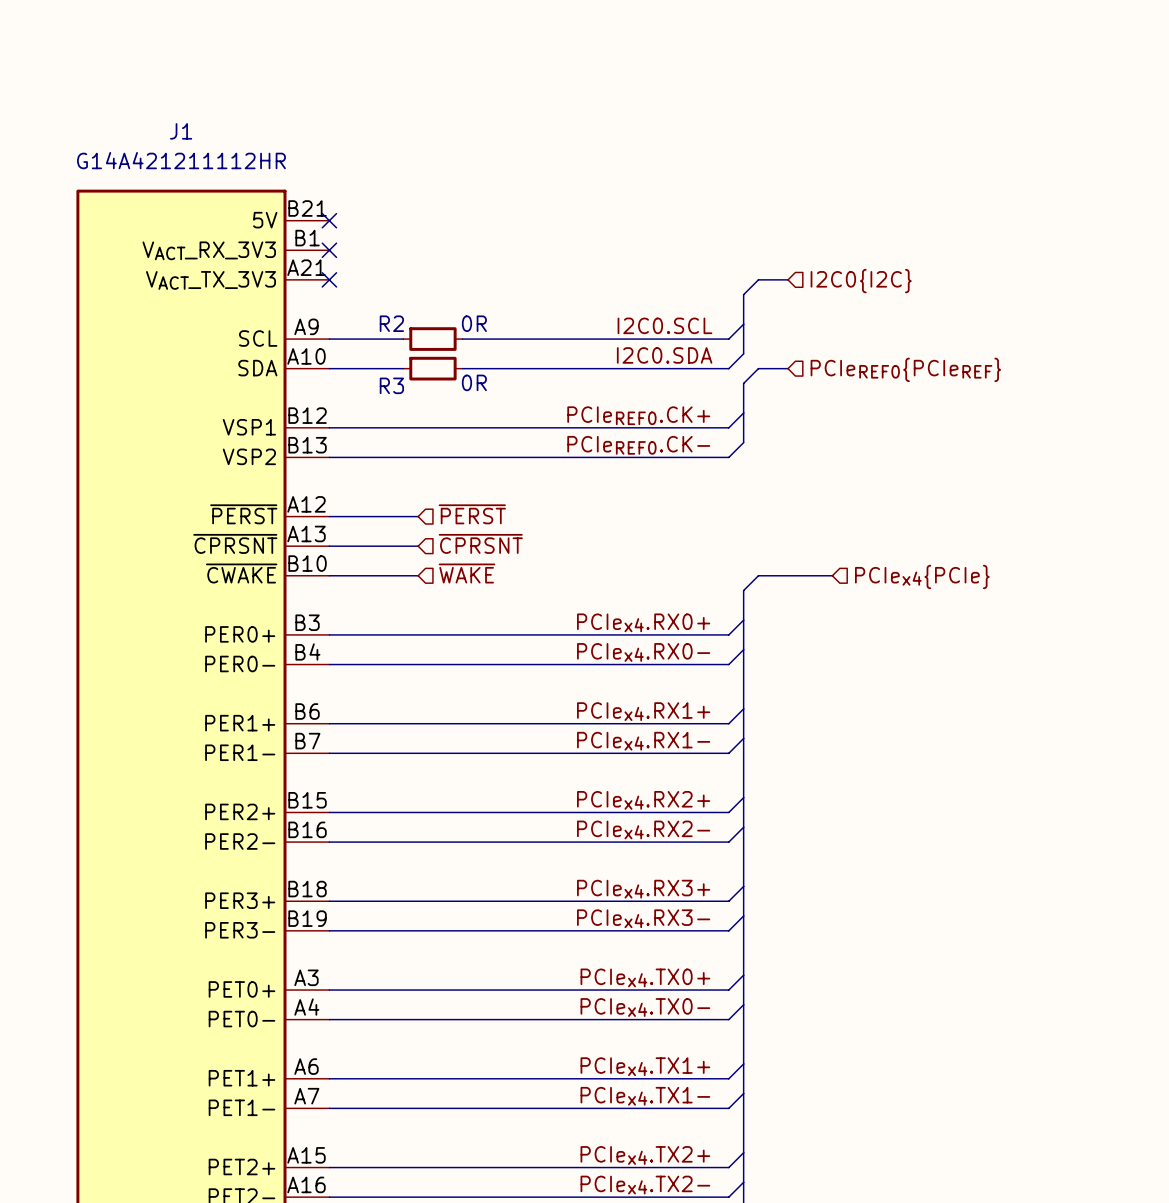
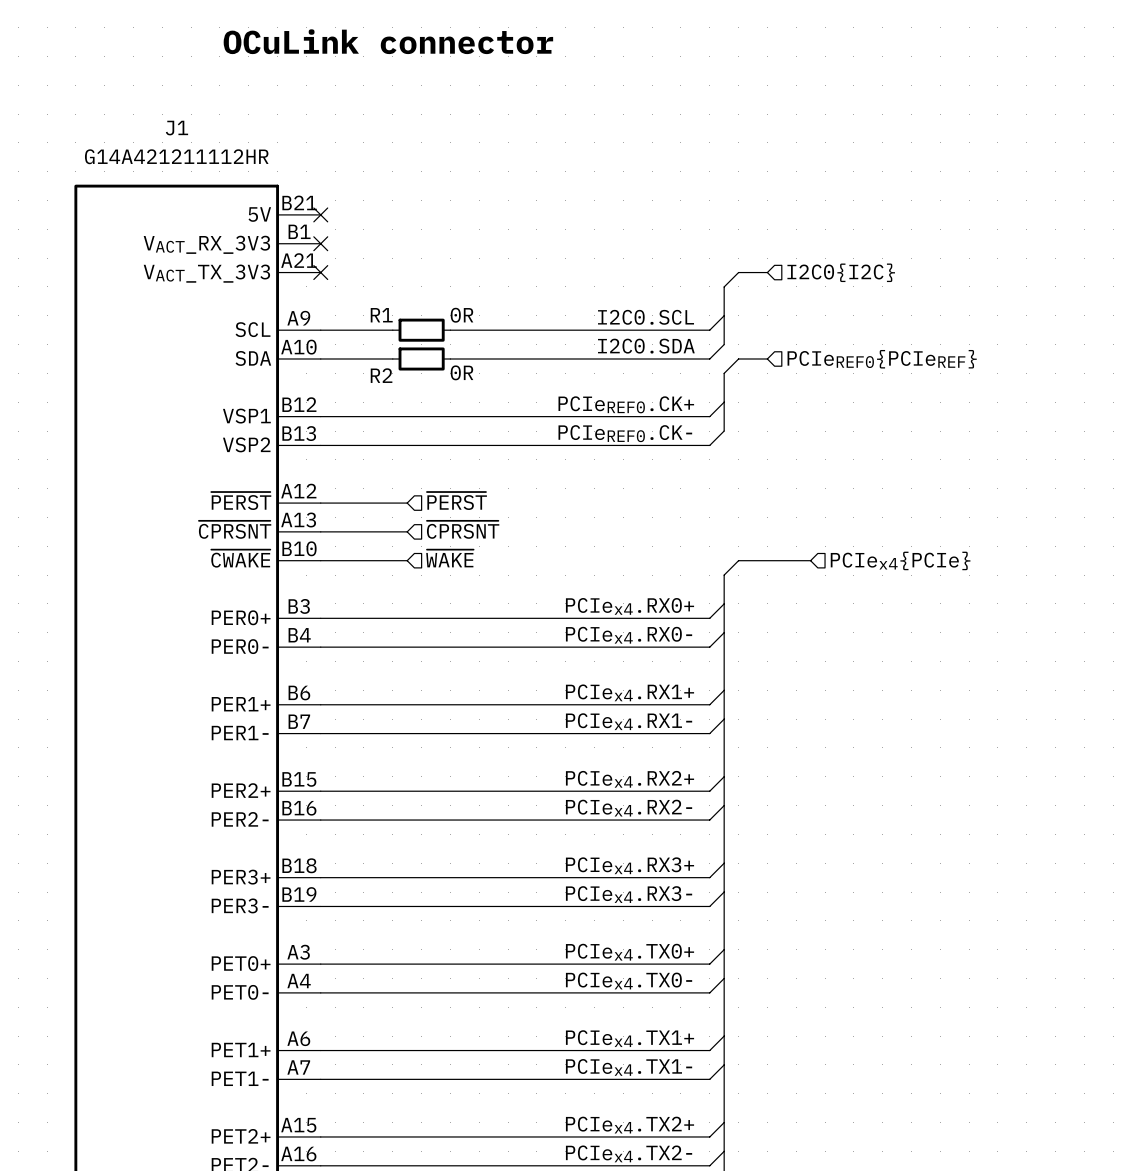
text: none -> OCuLink connector (388, 41)
R2 name: R2 (391, 323) -> R1 (381, 315)
R3 name: R3 (391, 385) -> R2 (381, 375)

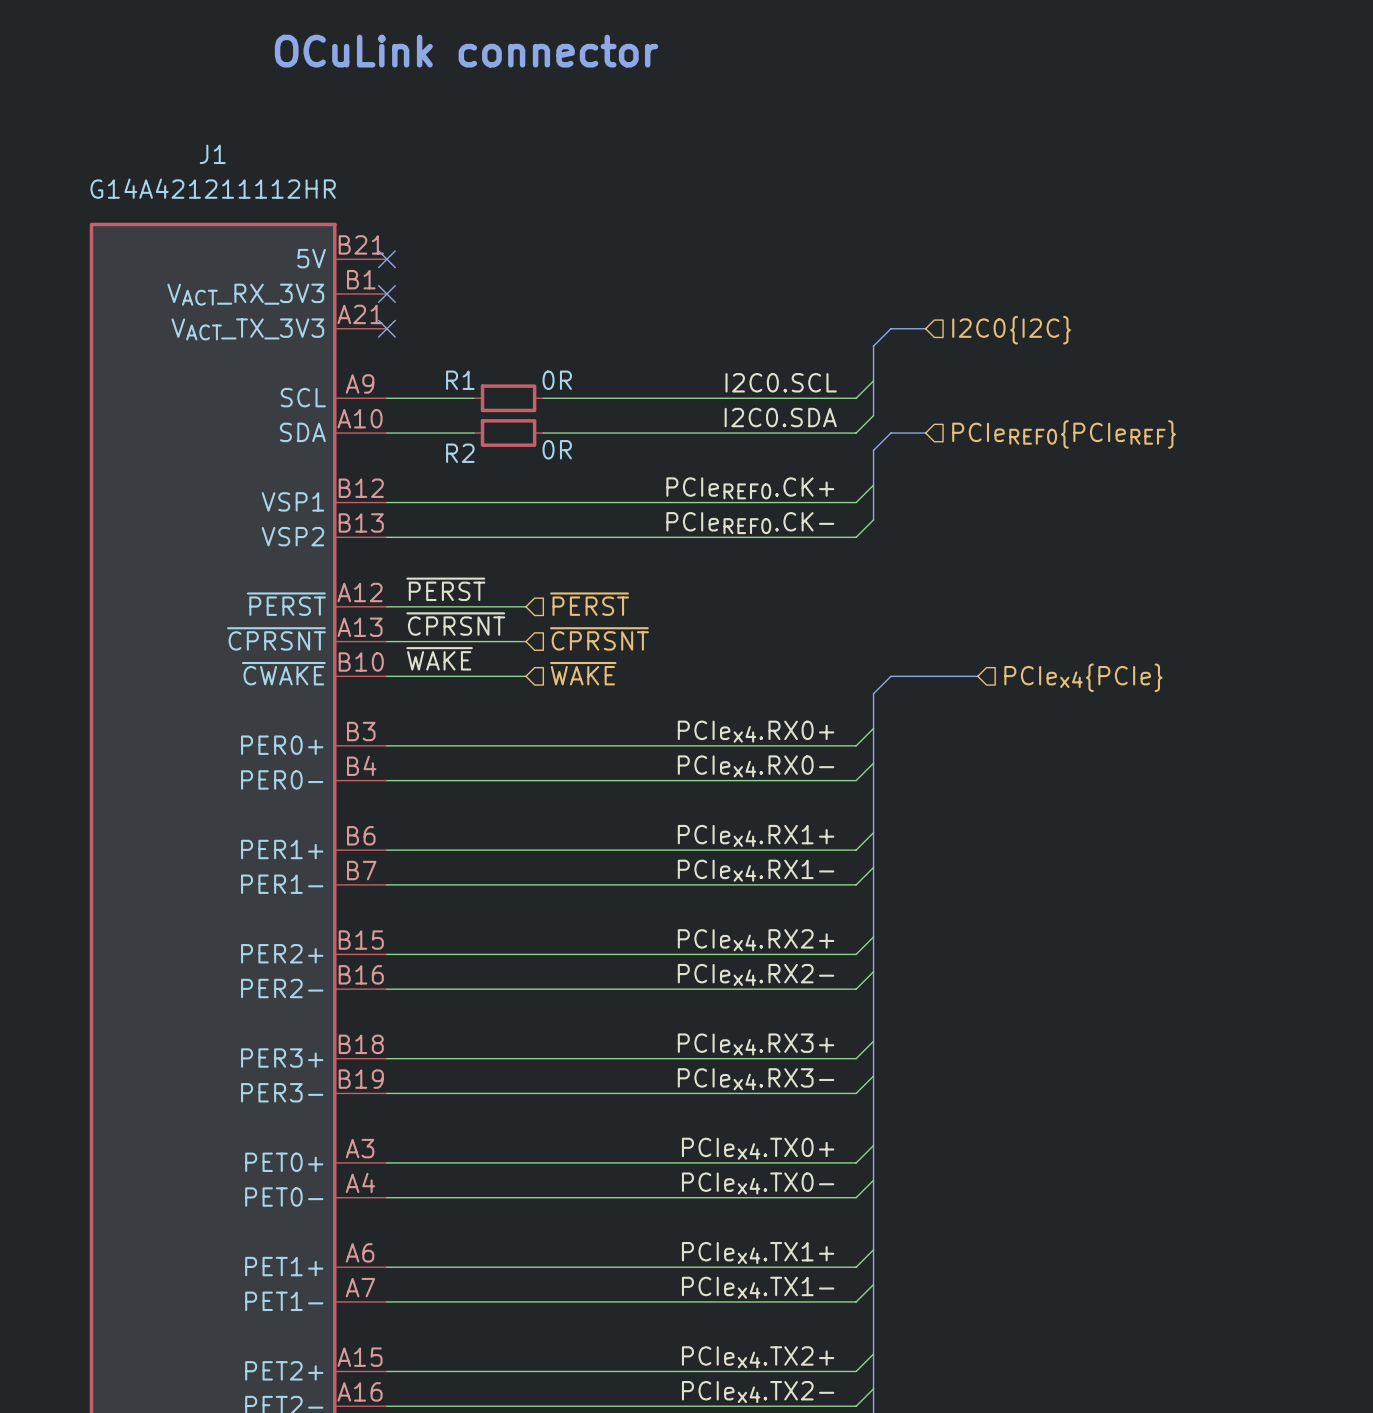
label: none -> ~{PERST} (445, 589)
hierarchical label position: ~{PERST} (456, 500) -> ~{PERST} (589, 604)
wire: none -> (491, 606) (525, 606)
label: none -> ~{CPRSNT} (455, 624)
hierarchical label position: ~{CPRSNT} (463, 529) -> ~{CPRSNT} (599, 638)
wire: none -> (491, 641) (525, 641)
label: none -> ~{WAKE} (439, 658)
hierarchical label position: ~{WAKE} (449, 558) -> ~{WAKE} (583, 673)
wire: none -> (491, 676) (525, 676)

